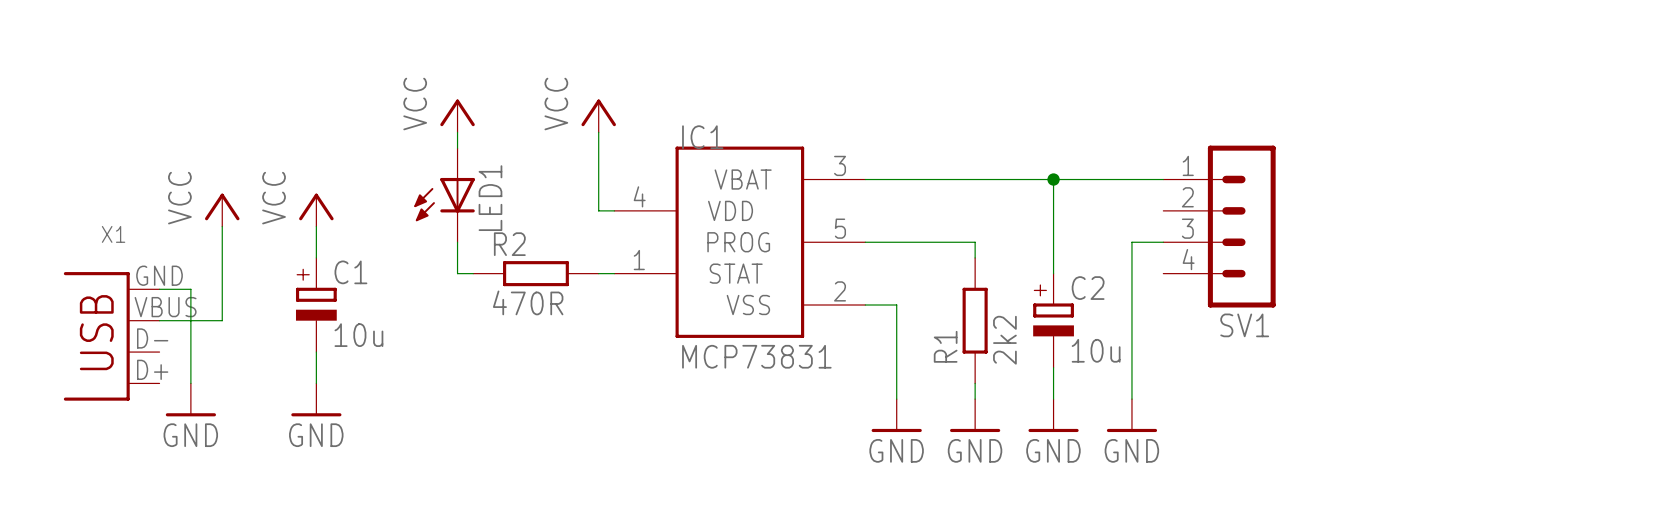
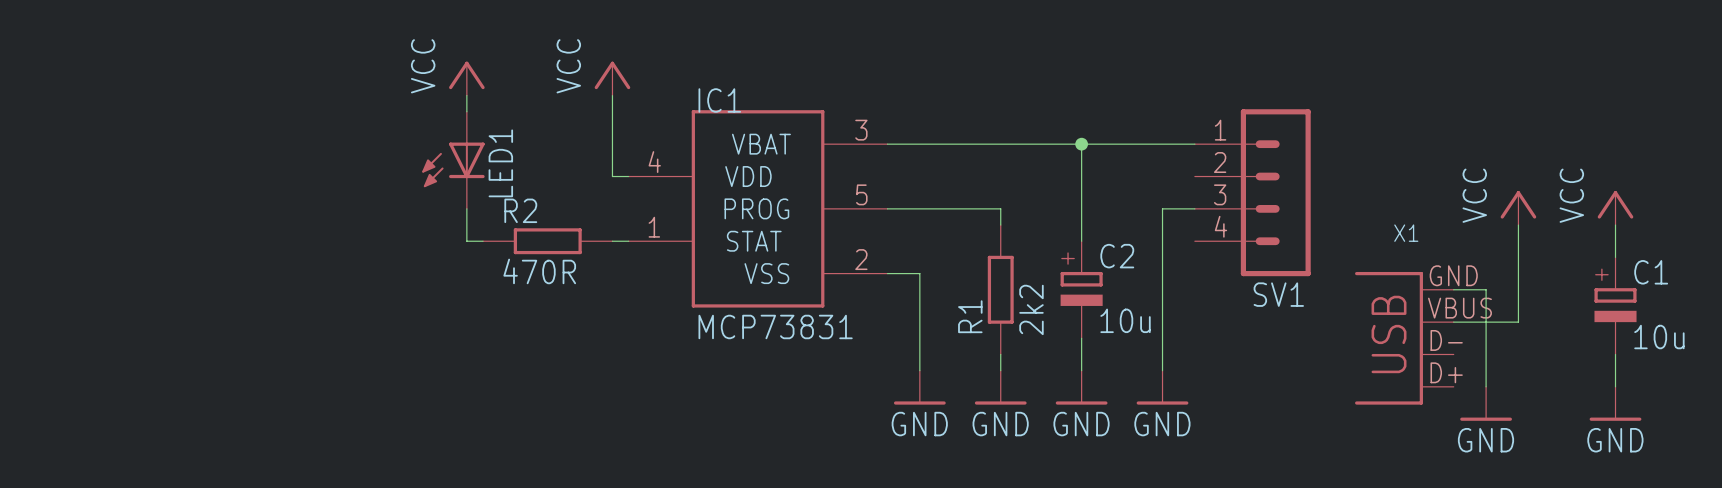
power symbol: VCC (222, 210) -> none
power symbol: VCC (316, 210) -> none
wire: (222, 226) (222, 320) (159, 320) -> none
wire: (316, 226) (316, 257) -> none
power symbol: none -> VCC (1518, 208)
power symbol: none -> VCC (1615, 208)
wire: none -> (1518, 225) (1518, 322) (1453, 322)
wire: none -> (1615, 225) (1615, 257)
wire: (159, 289) (190, 289) (190, 383) -> none
C1 position: (316, 305) -> (1615, 305)
wire: none -> (1453, 289) (1486, 289) (1486, 386)
X1 position: (111, 336) -> (1404, 338)
wire: (316, 352) (316, 383) -> none
wire: none -> (1615, 354) (1615, 386)
power symbol: GND (190, 399) -> none
power symbol: GND (316, 399) -> none
power symbol: none -> GND (1486, 403)
power symbol: none -> GND (1615, 403)

